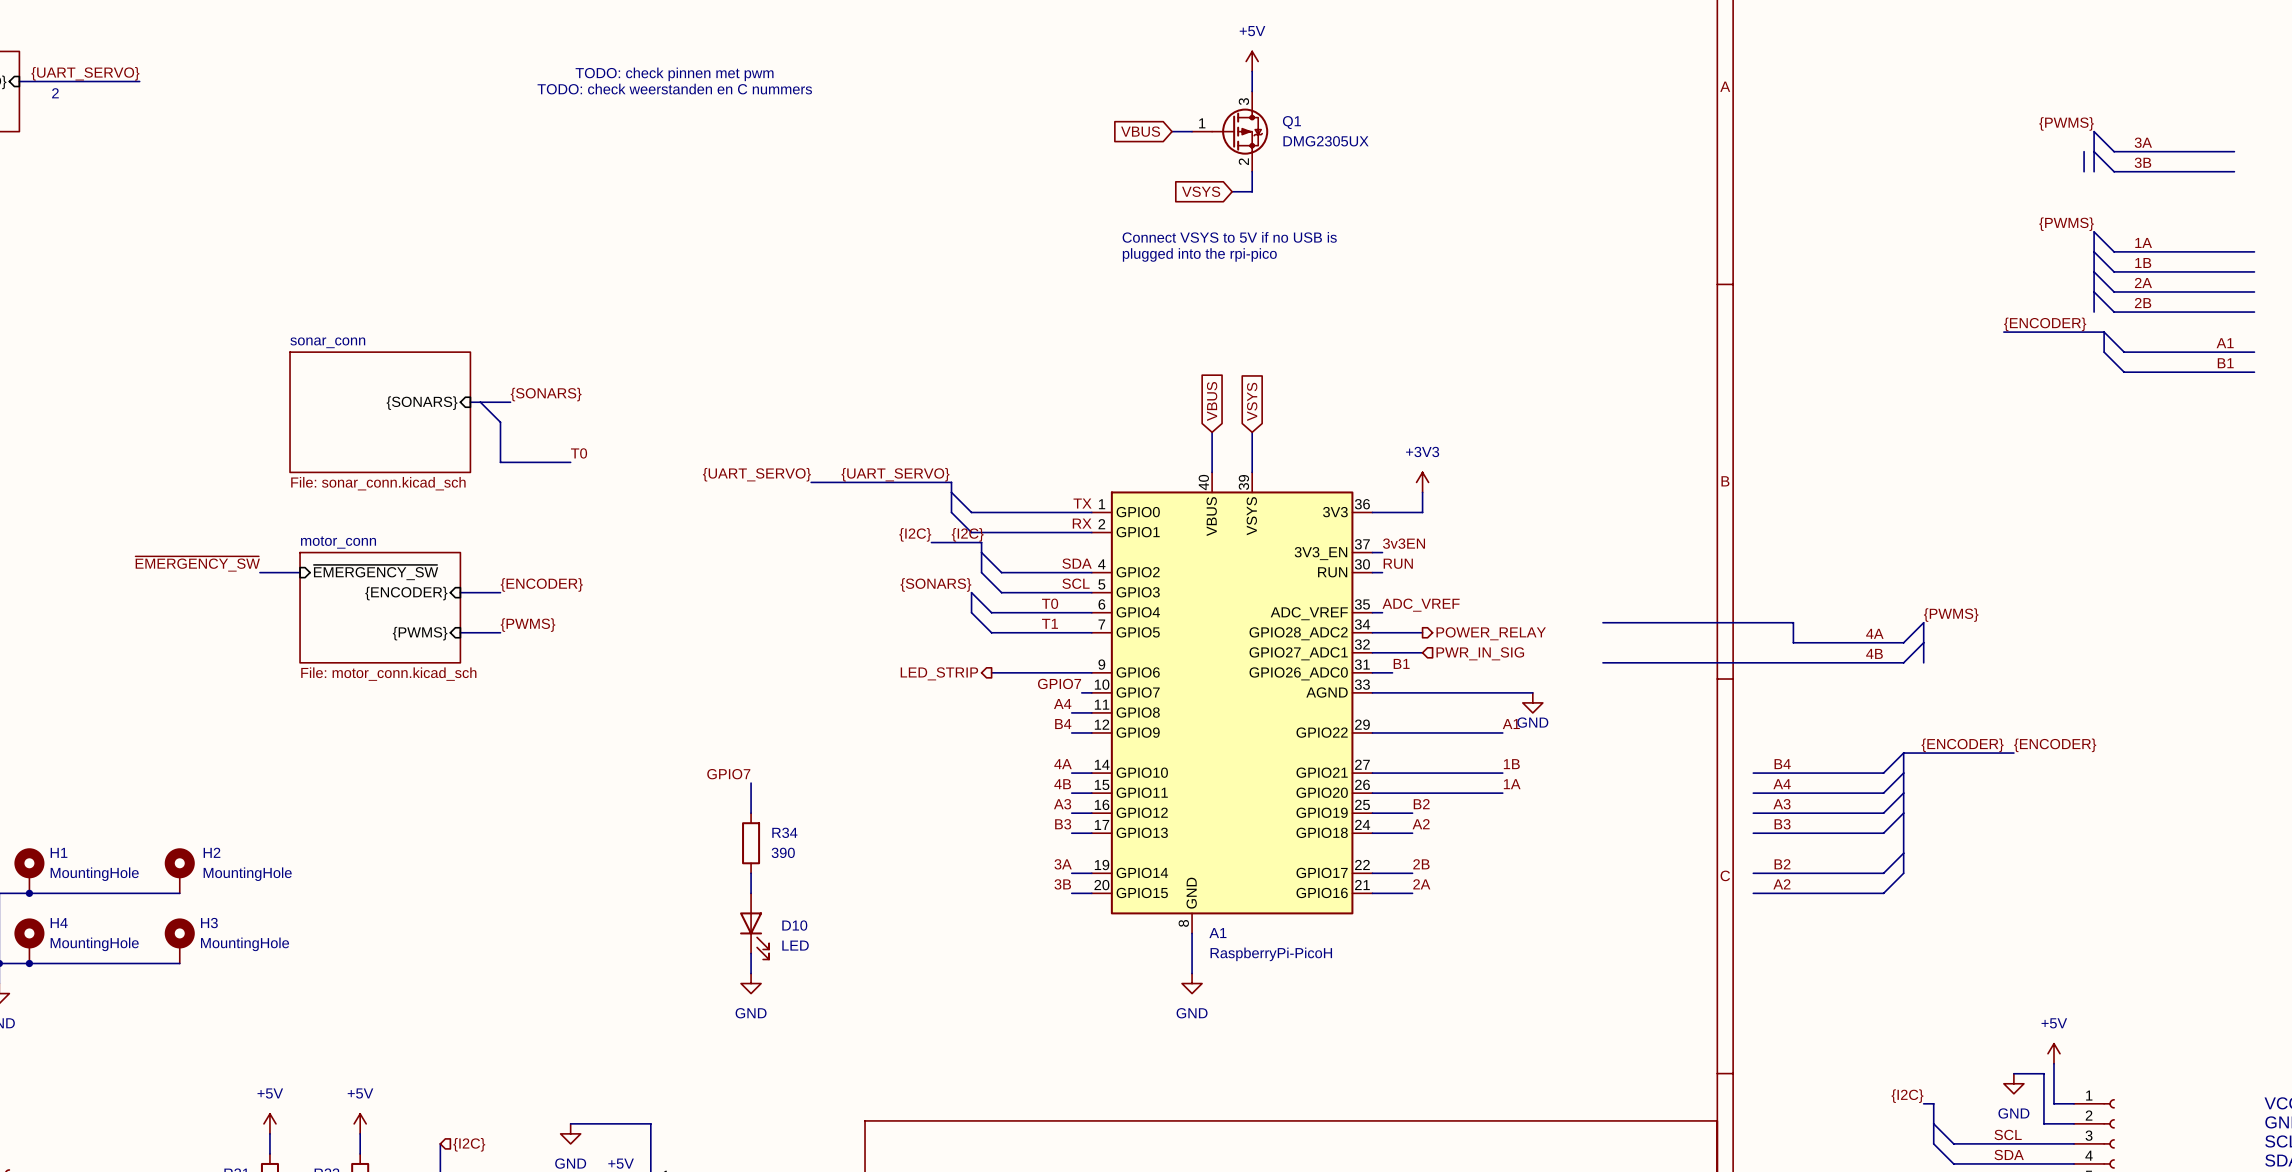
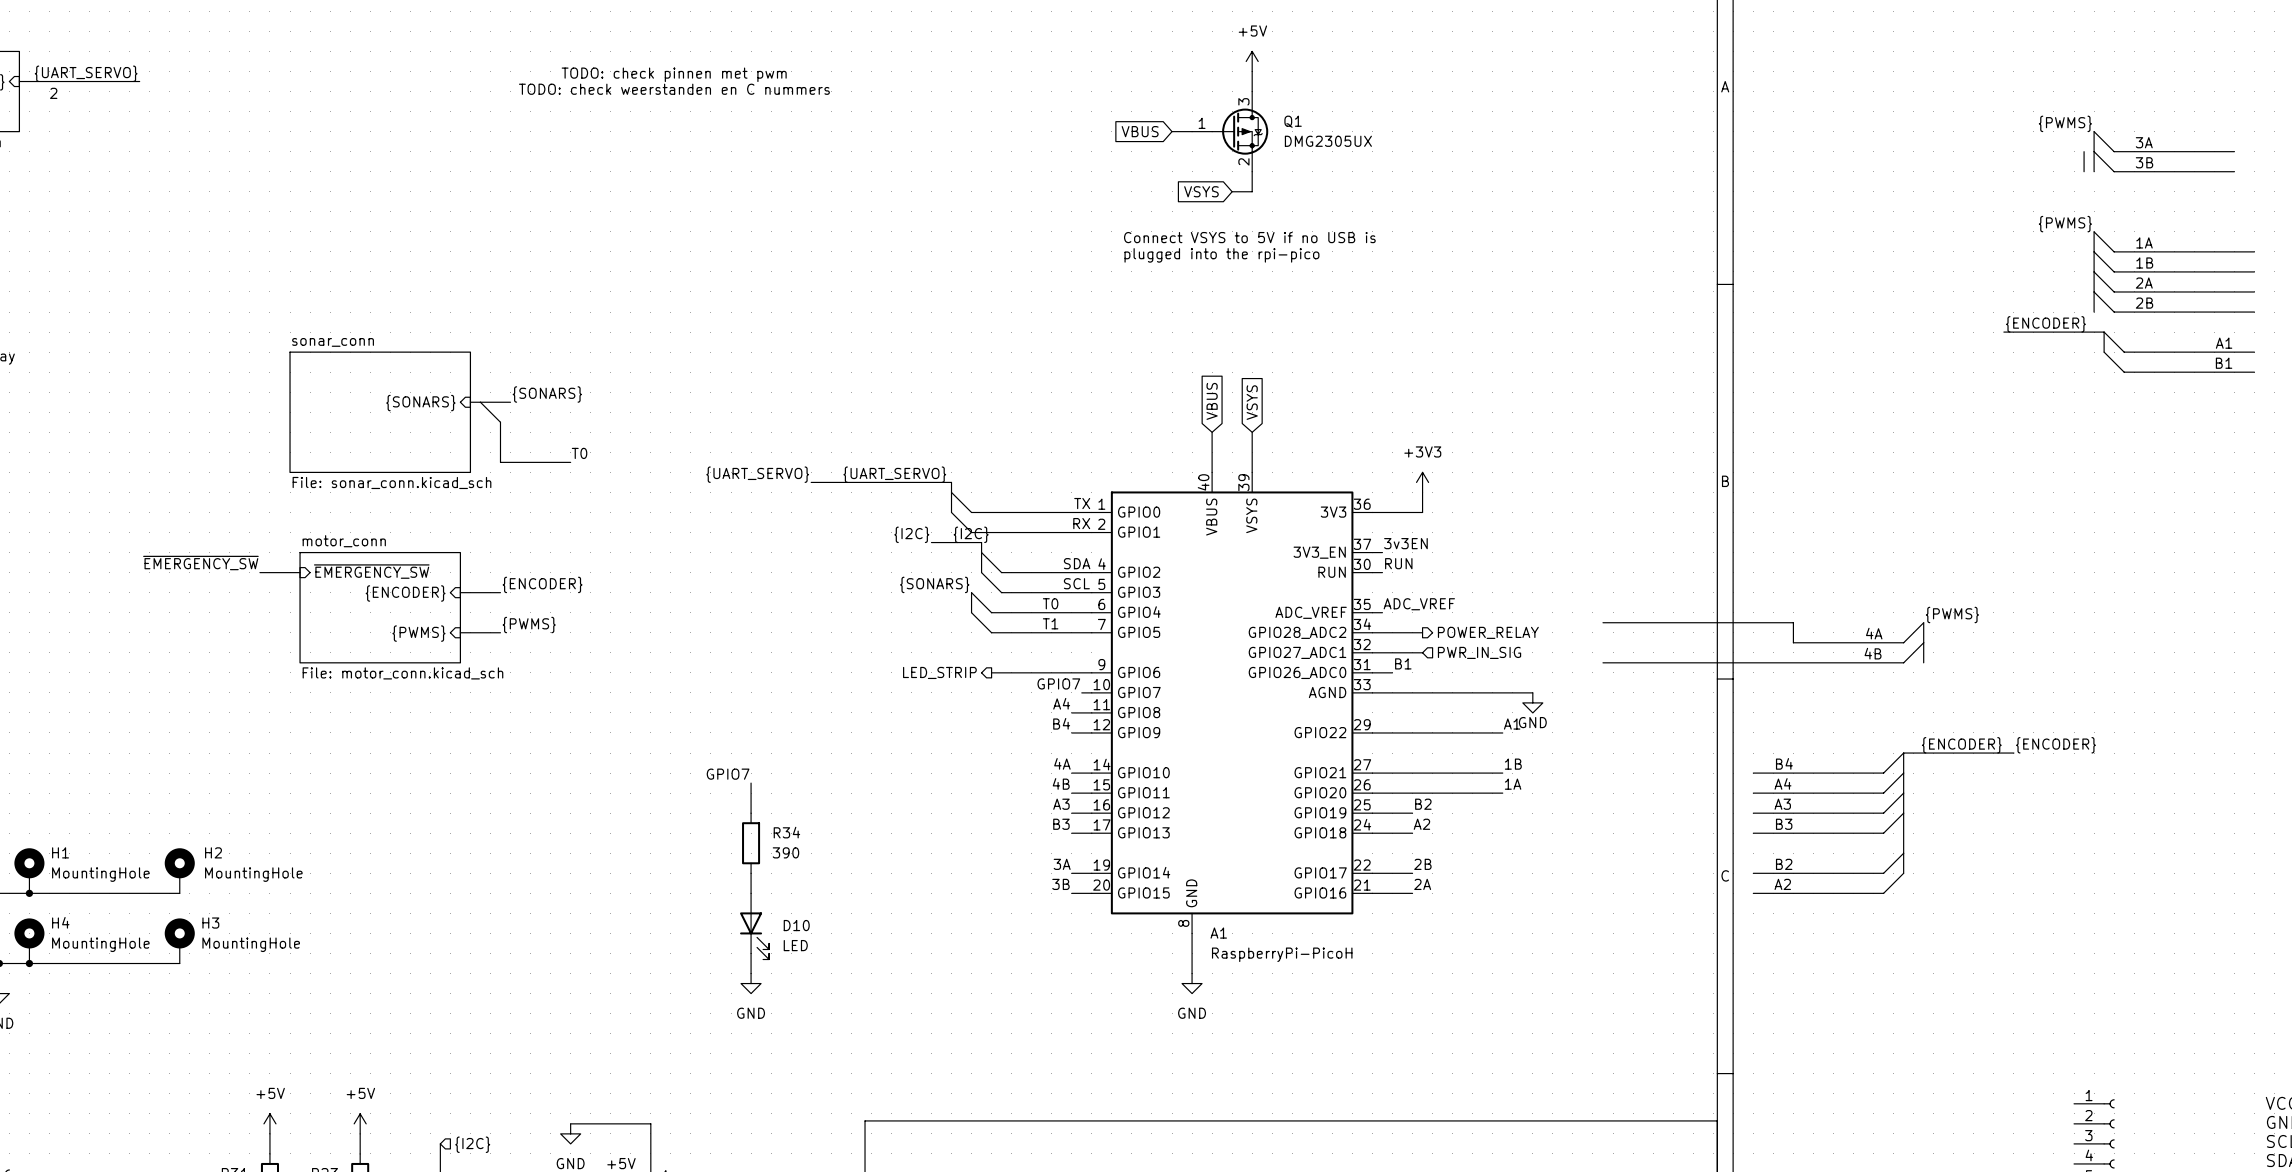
power symbol: +5V (2053, 1053) -> none
wire: (2053, 1063) (2053, 1103) (2074, 1103) -> none
wire: (2013, 1073) (2043, 1073) (2043, 1123) (2074, 1123) -> none
power symbol: GND (2013, 1083) -> none
label: {I2C} (1907, 1096) -> none
bus: (1923, 1103) (1933, 1103) (1933, 1143) -> none
wire: (1933, 1123) (1953, 1143) (2074, 1143) -> none
label: SCL (2008, 1134) -> none
wire: (1933, 1143) (1953, 1163) (2074, 1163) -> none
label: SDA (2009, 1155) -> none

